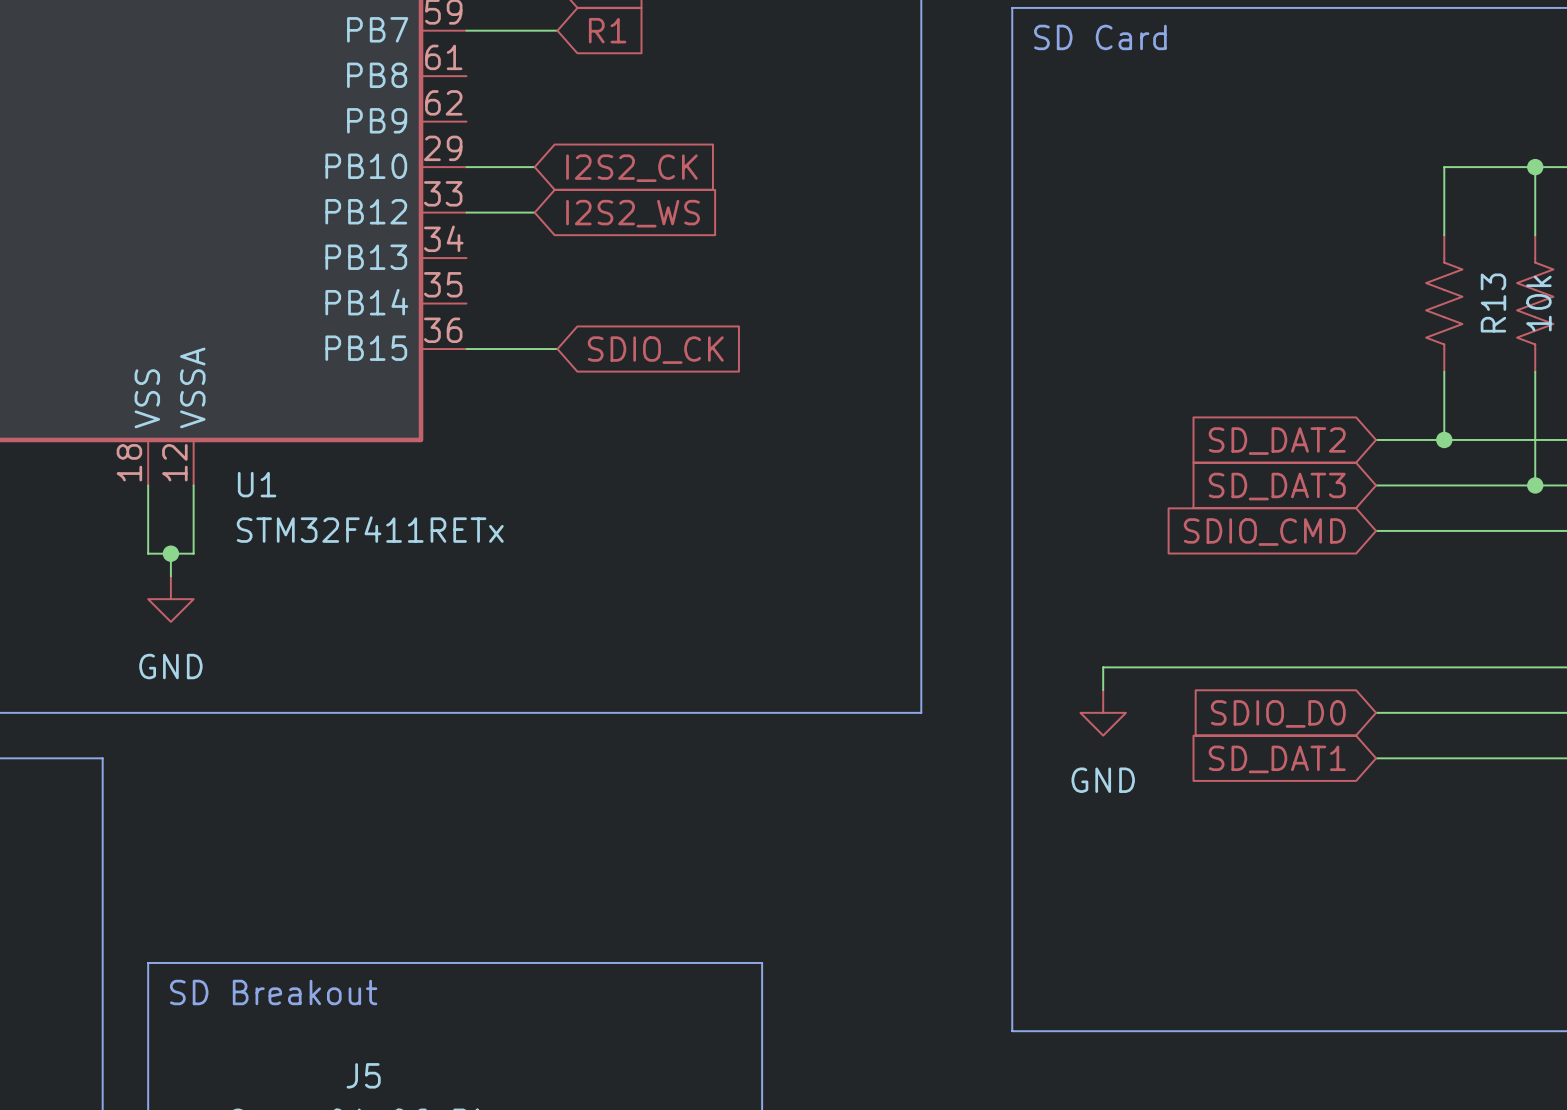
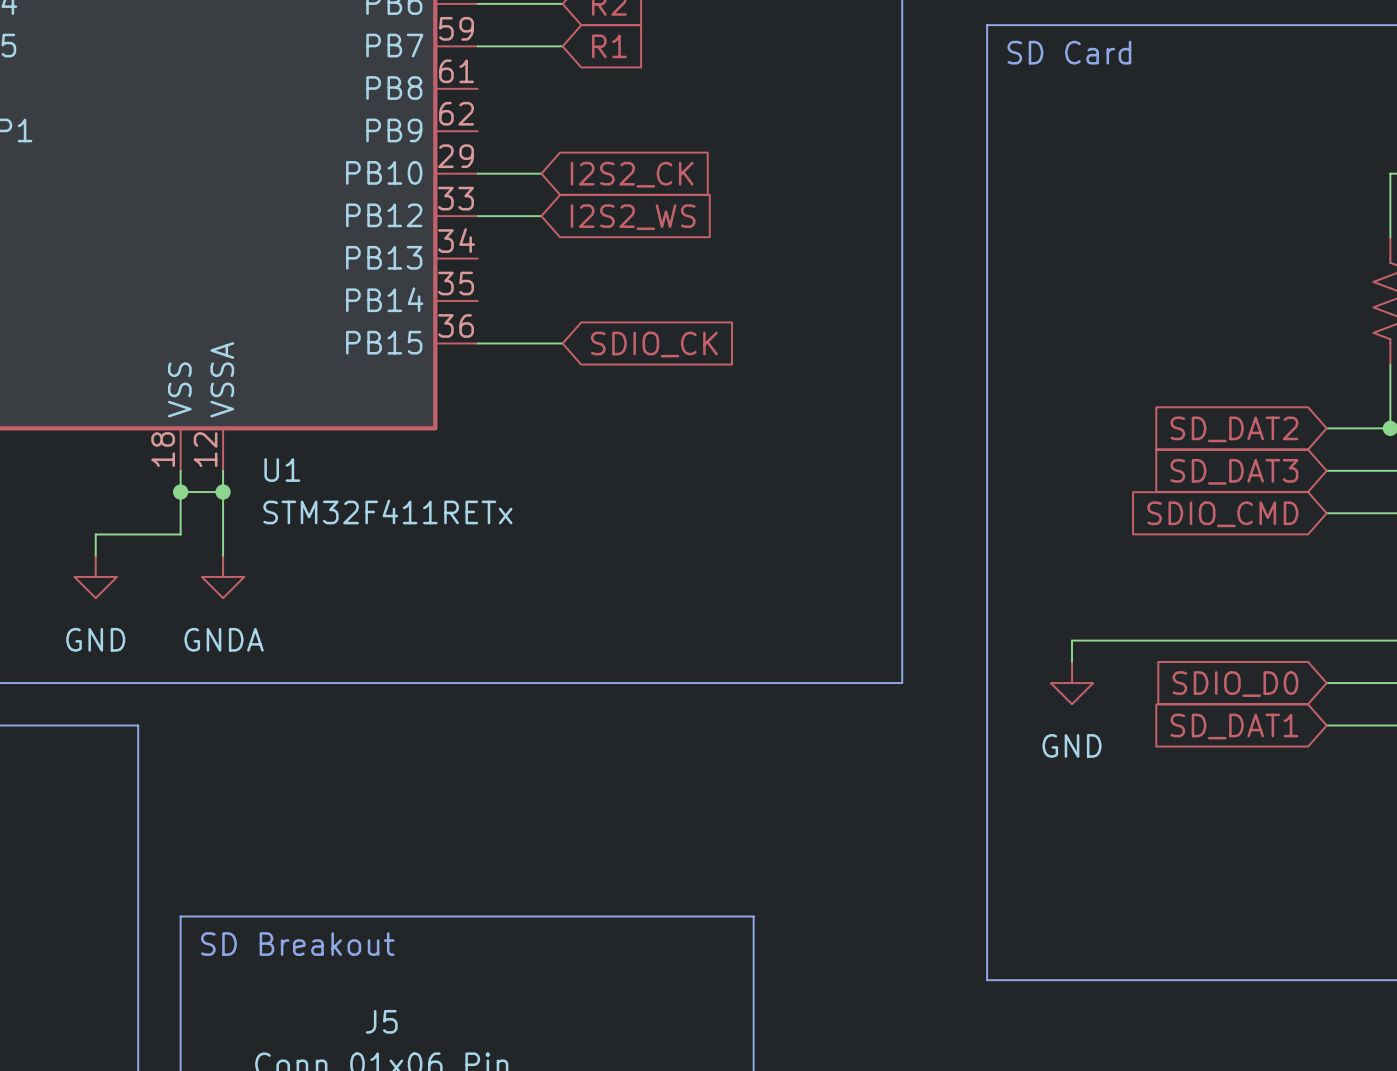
wire: none -> (180, 492) (223, 492)
junction: none -> (180, 492)
junction: none -> (223, 492)
wire: (148, 553) (193, 553) -> (223, 555) (223, 534)
wire: none -> (180, 534) (95, 534) (95, 555)
wire: (170, 553) (170, 576) -> none
junction: (170, 553) -> none
power symbol position: GND (170, 599) -> GND (95, 576)
power symbol: none -> GNDA (223, 576)

